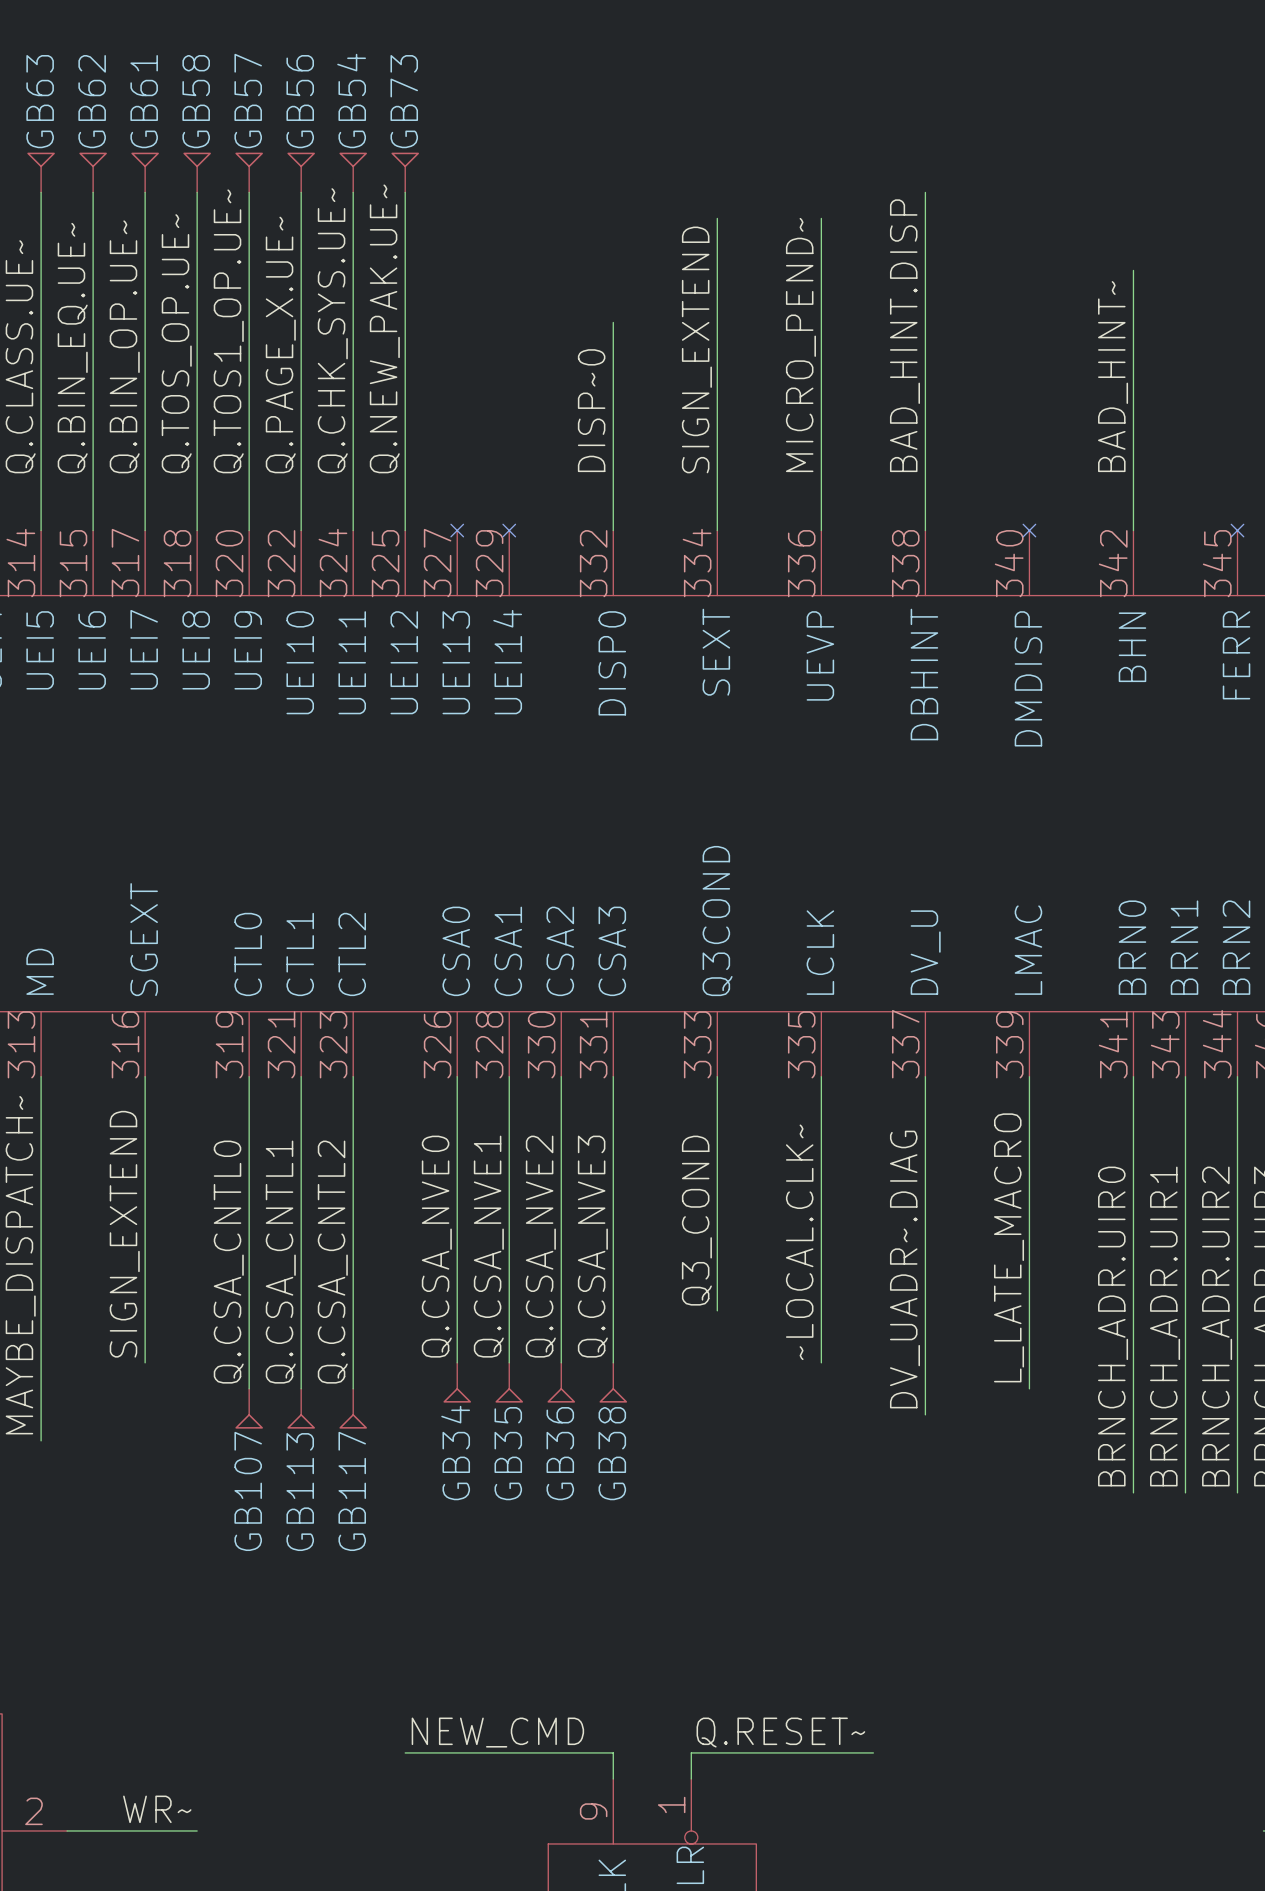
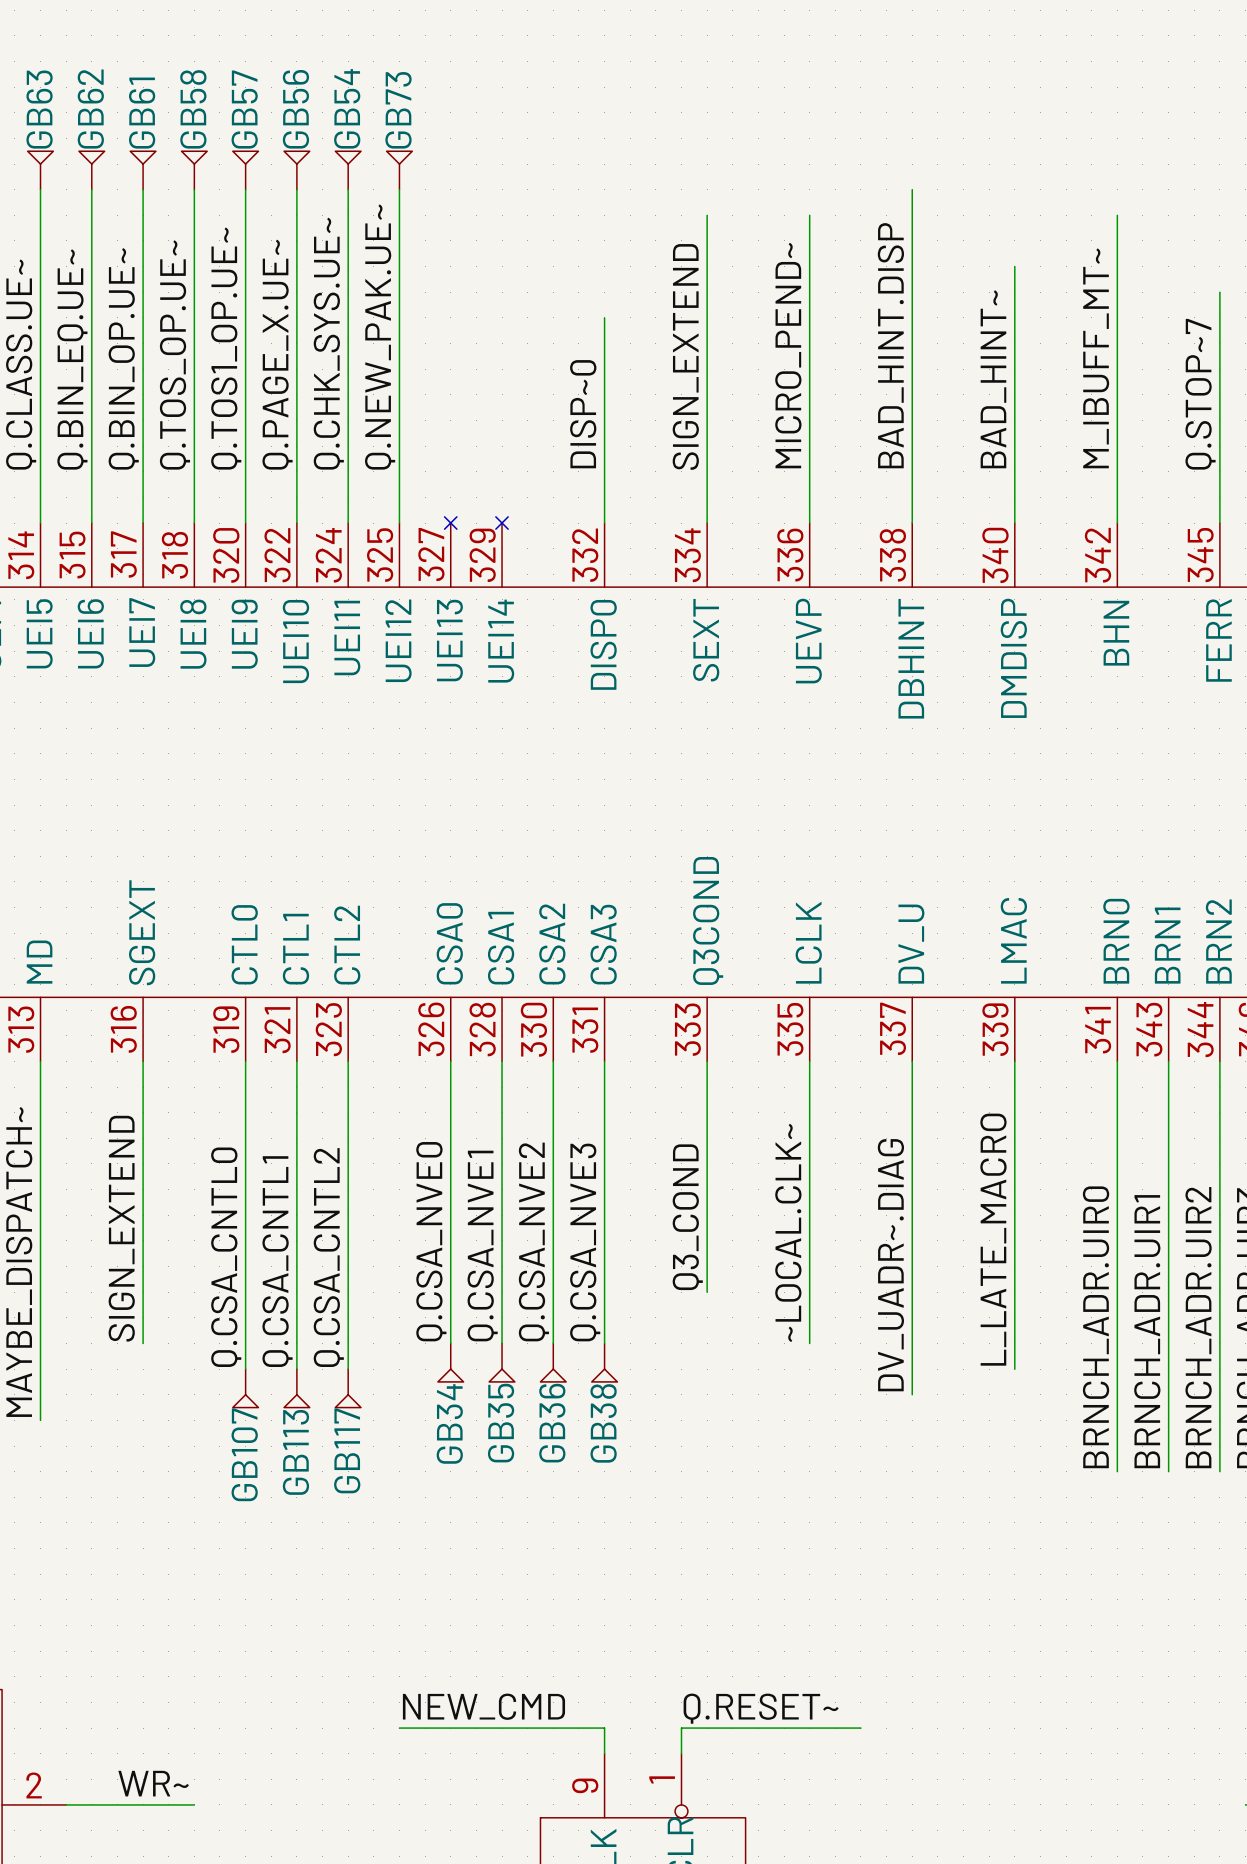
wire: none -> (1117, 215) (1117, 266)
wire: none -> (1014, 266) (1014, 523)
wire: none -> (1219, 292) (1219, 523)
label: none -> BAD_HINT~ (993, 379)
label: BAD_HINT~ (1113, 376) -> M_IBUFF_MT~ (1096, 358)
label: none -> Q.STOP~7 (1200, 394)
no-connect mark: (1029, 530) -> none
no-connect mark: (1237, 530) -> none

